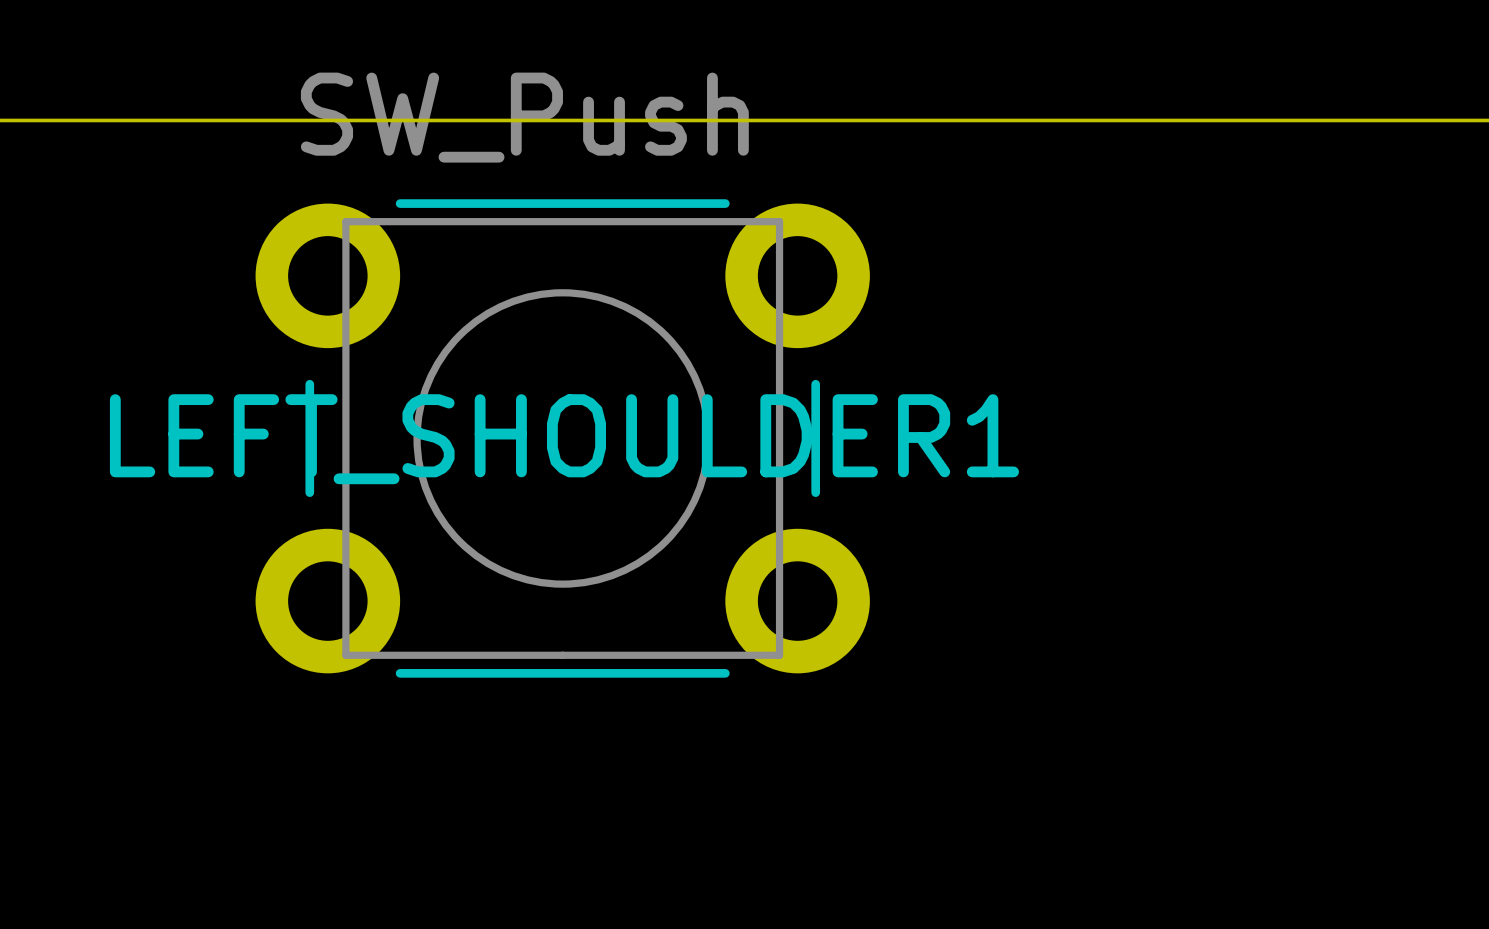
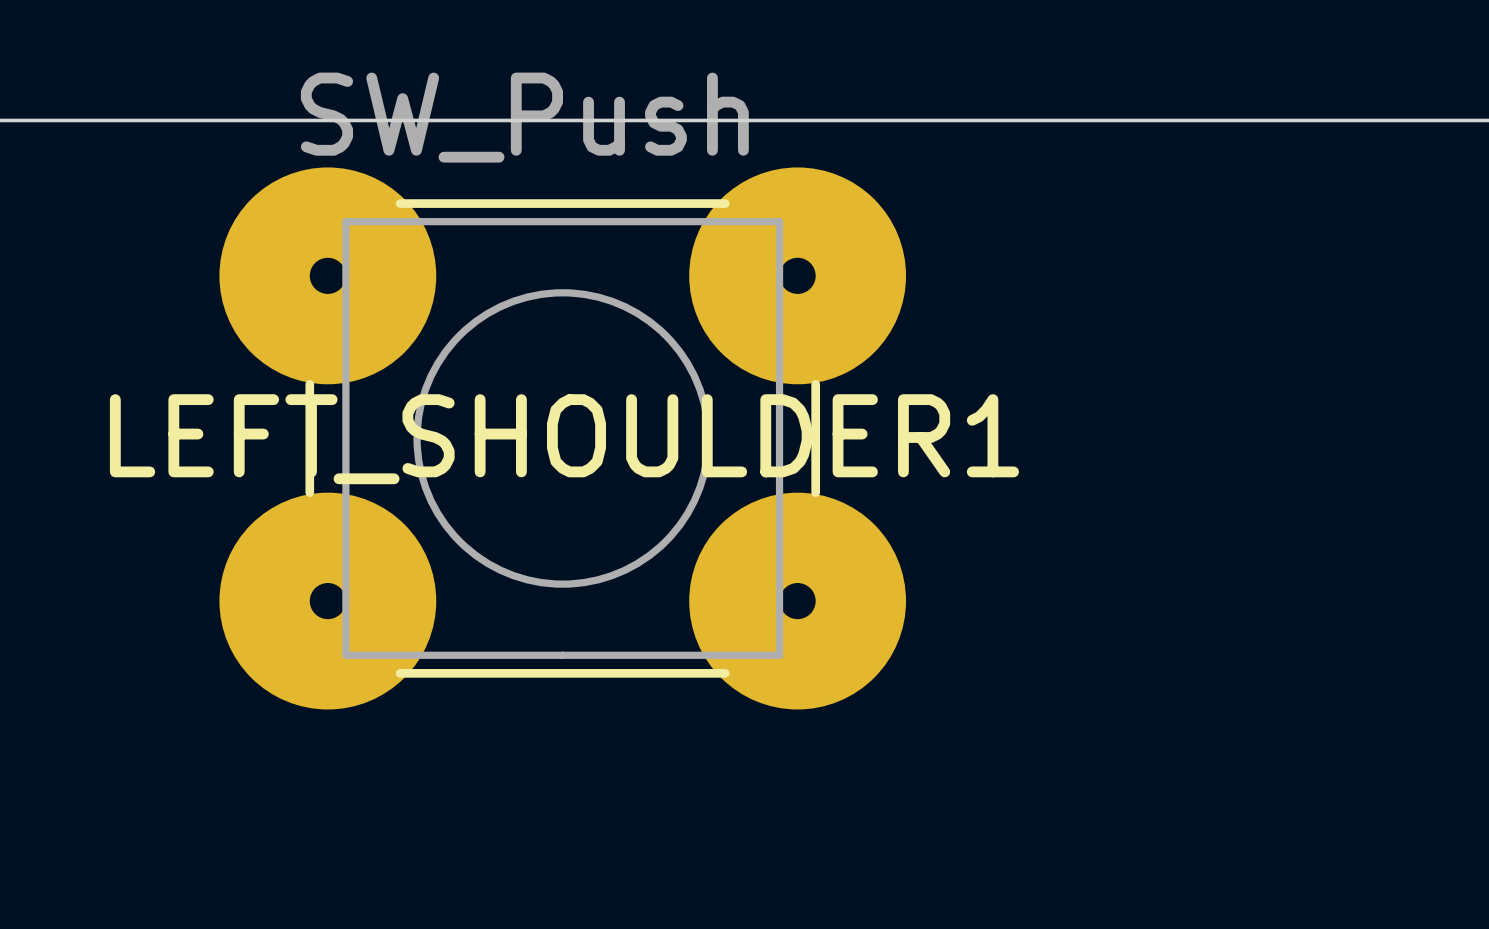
LEFT_SHOULDER1 footprint: [255, 199, 870, 678] -> [219, 167, 907, 710]

